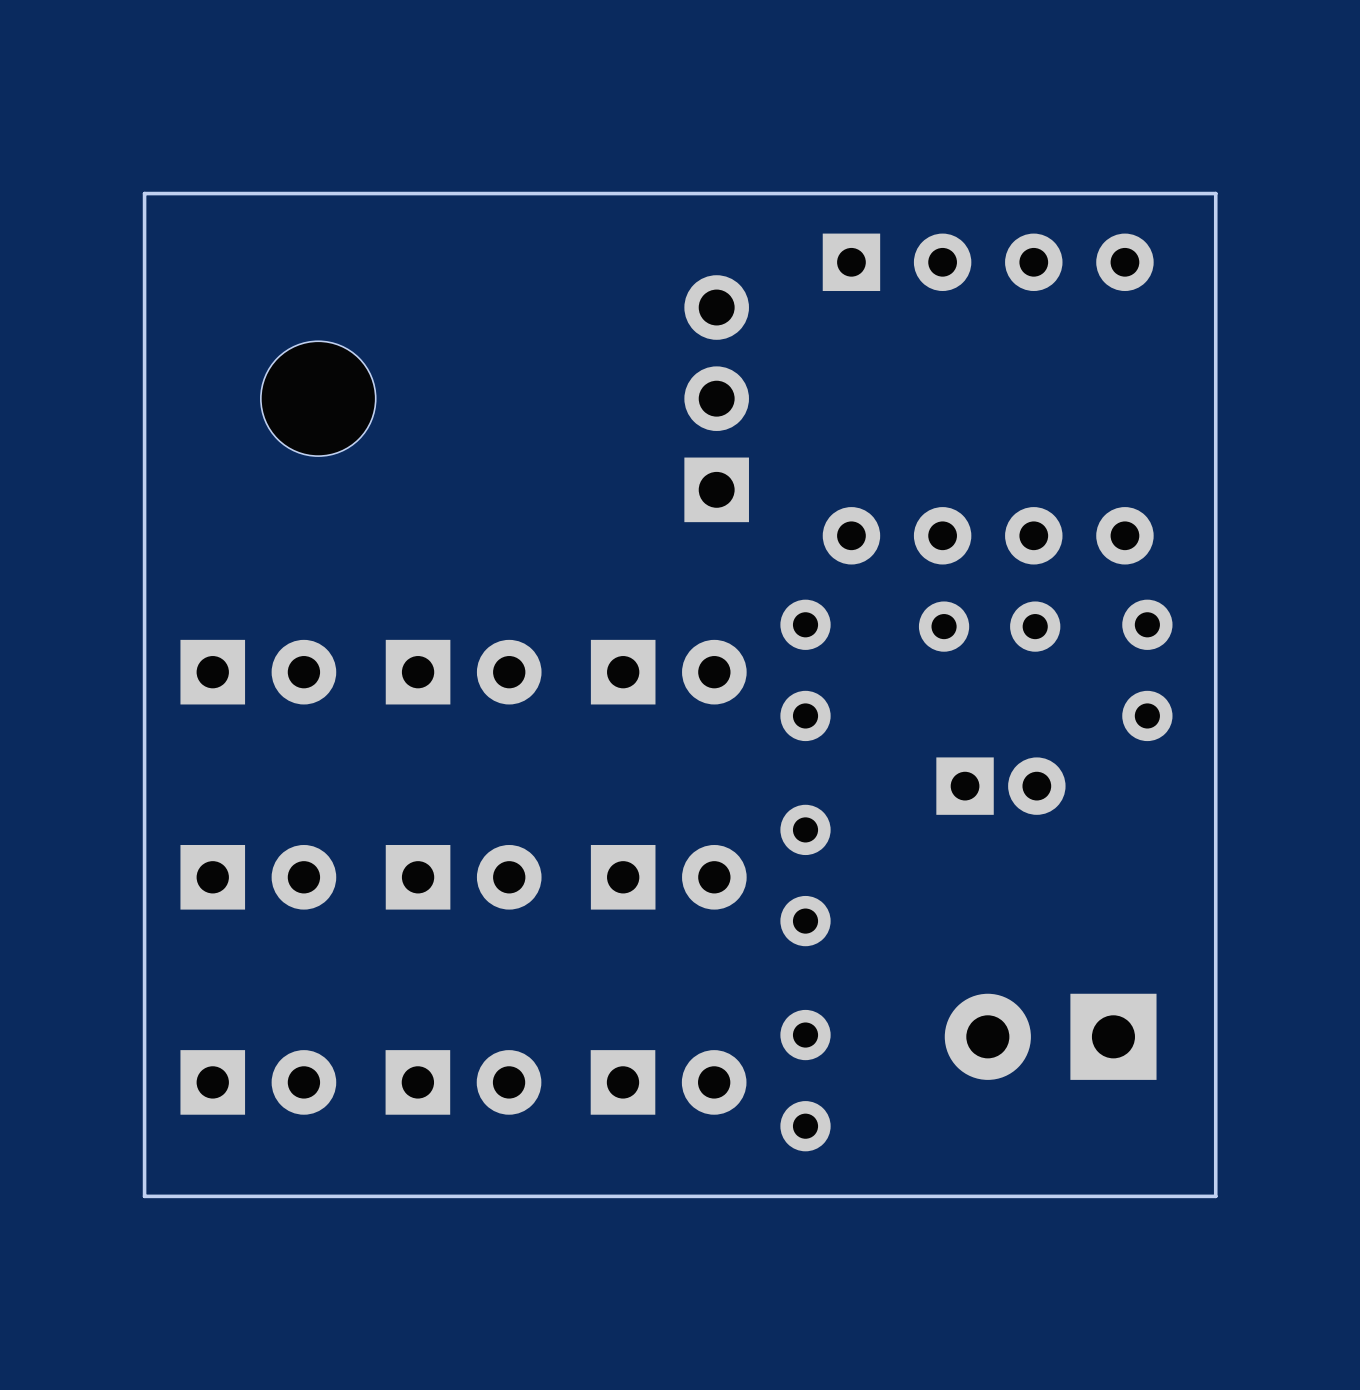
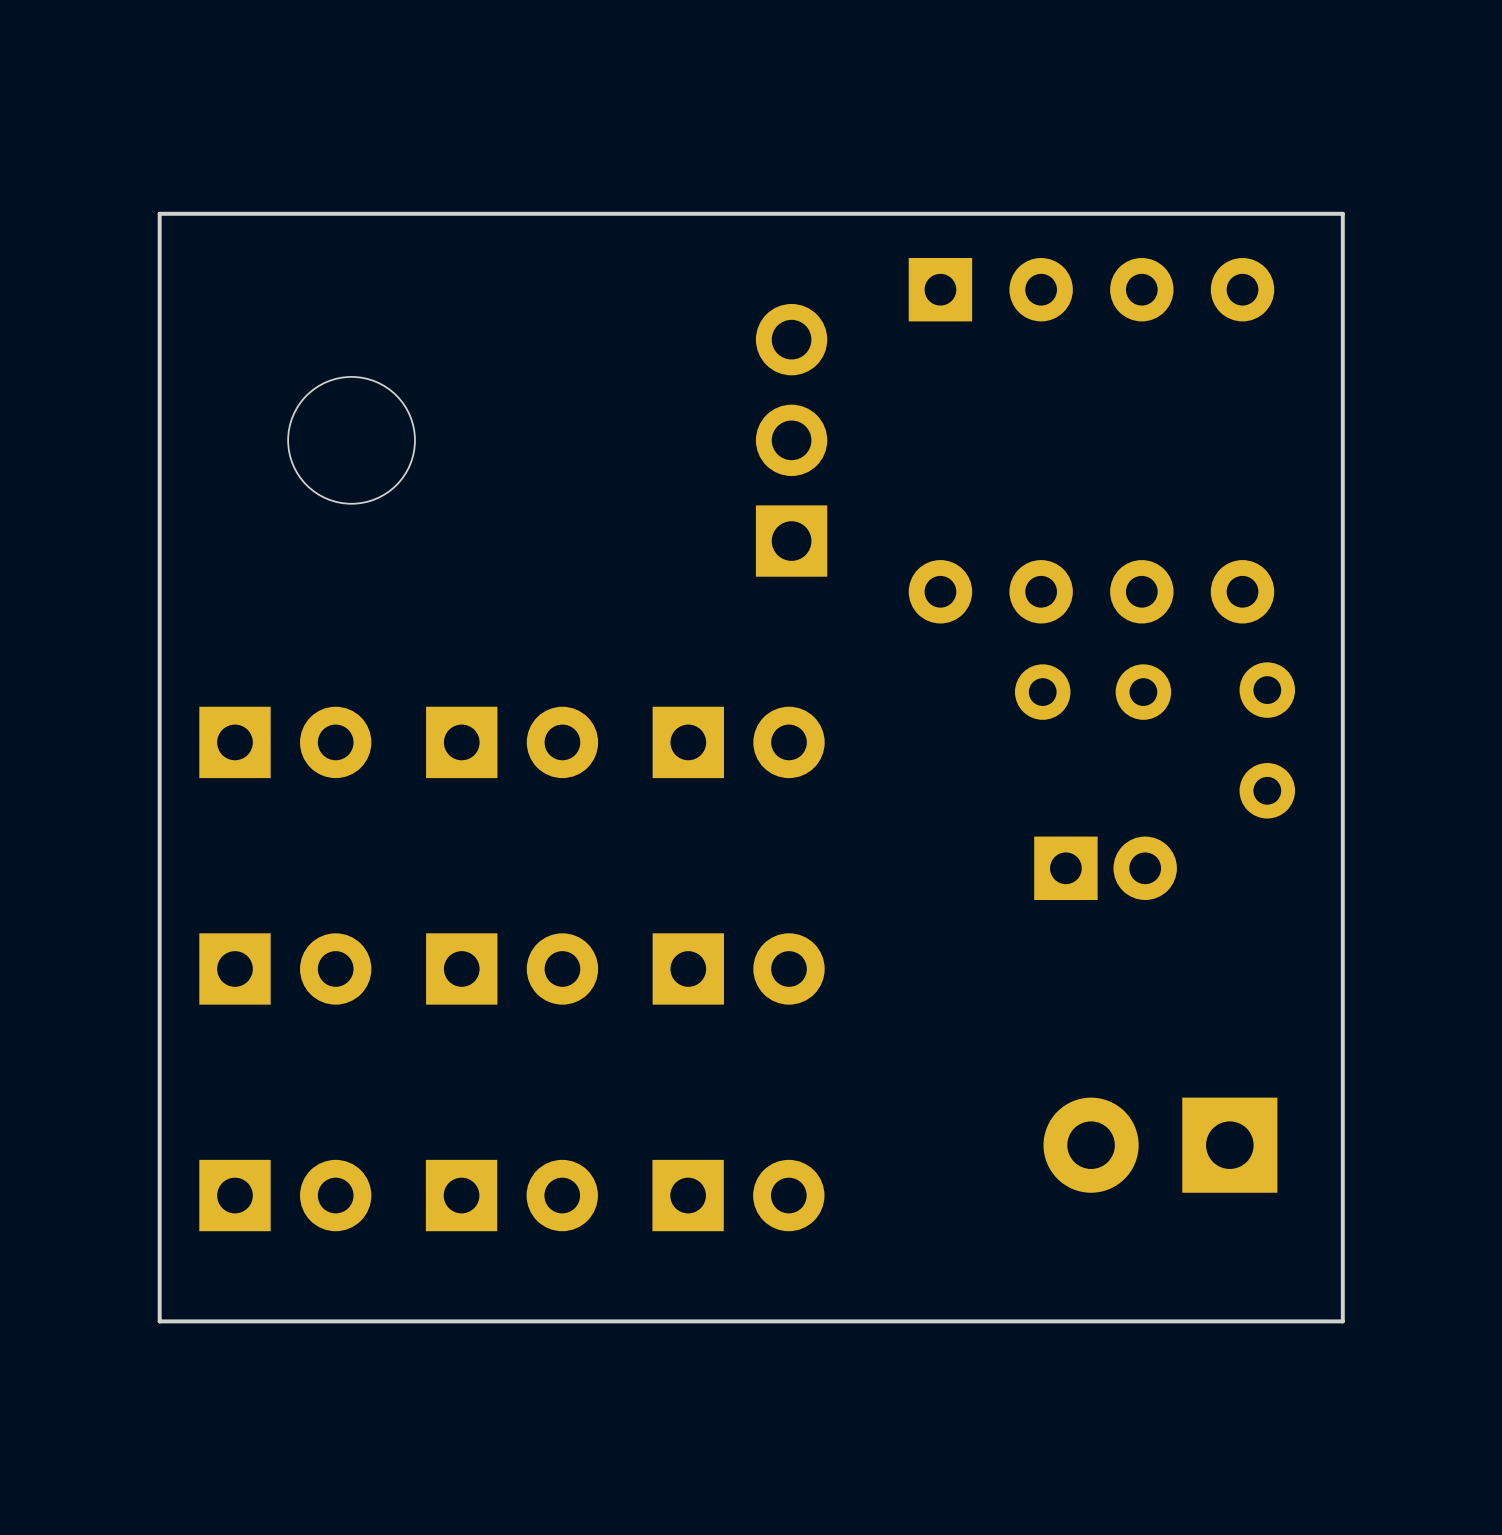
part: (805, 670) -> none
part: (805, 875) -> none
part: (805, 1080) -> none

